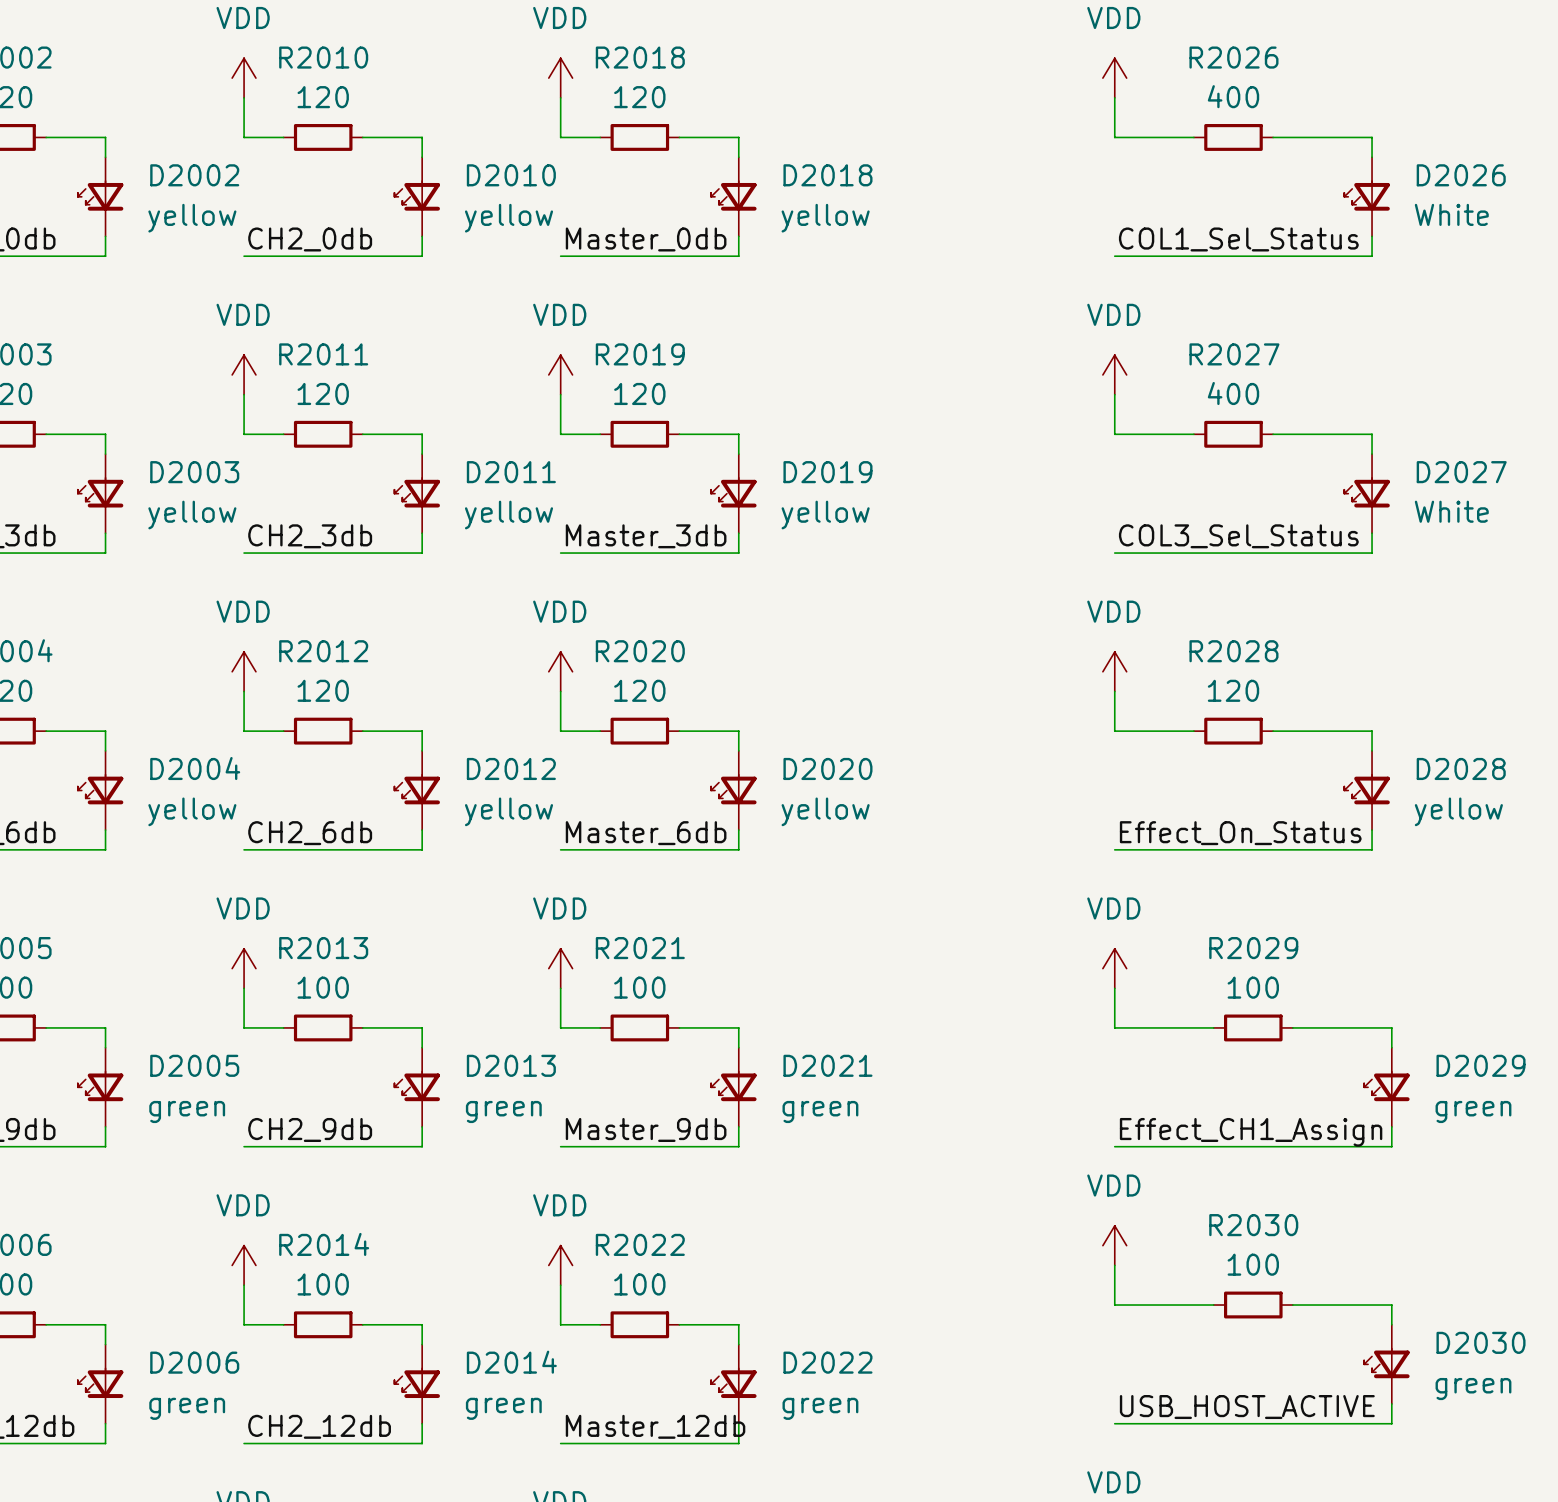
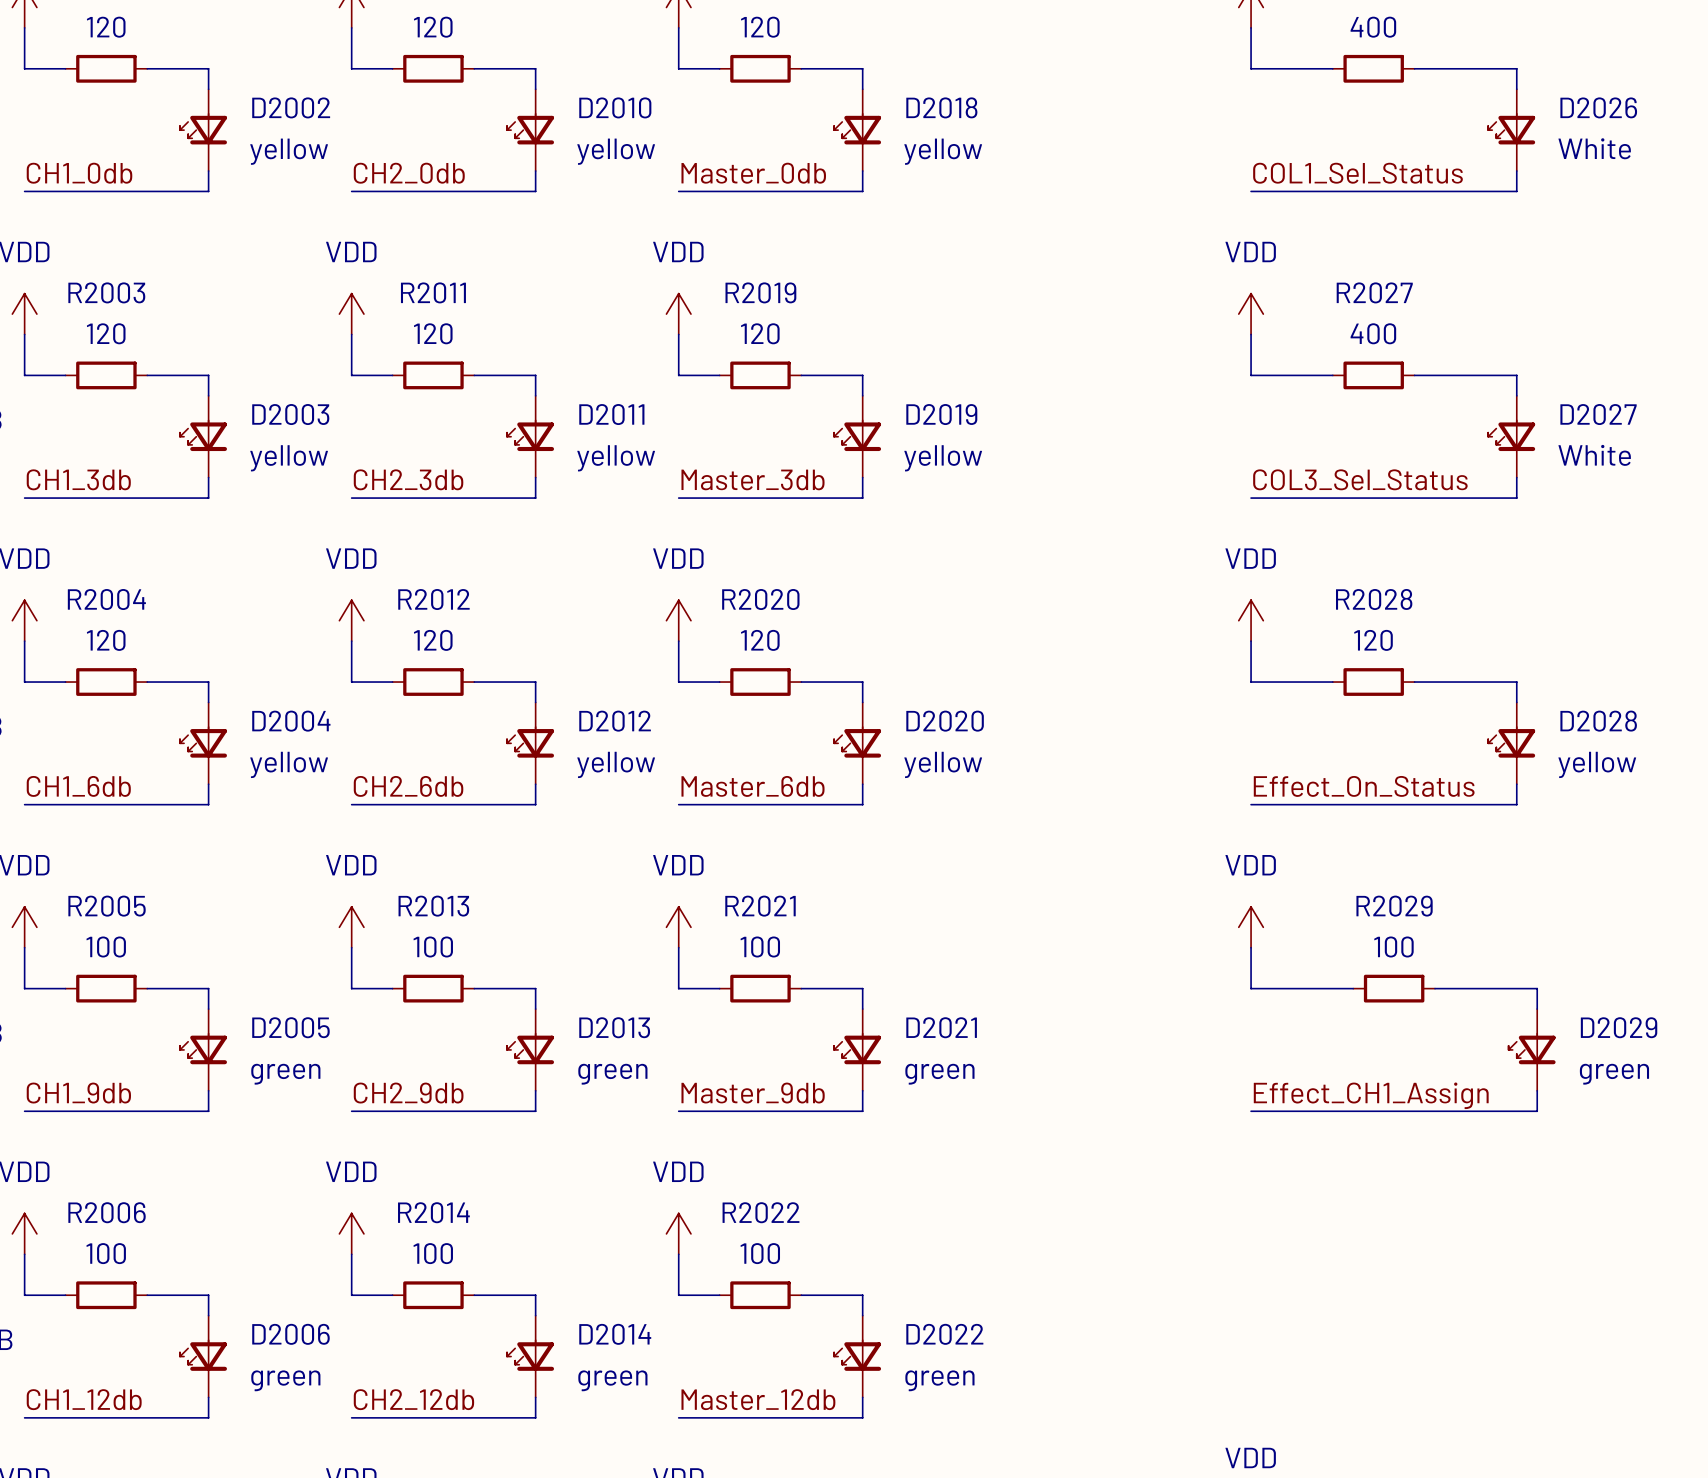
power symbol: VDD (1114, 1245) -> none
wire: (1114, 1265) (1114, 1305) (1213, 1305) -> none
R2030: 100 (1253, 1305) -> none
wire: (1292, 1305) (1391, 1305) (1391, 1324) -> none
D2030: green (1386, 1364) -> none
wire: (1391, 1403) (1391, 1423) (1114, 1423) -> none
label: USB_HOST_ACTIVE (1247, 1407) -> none

